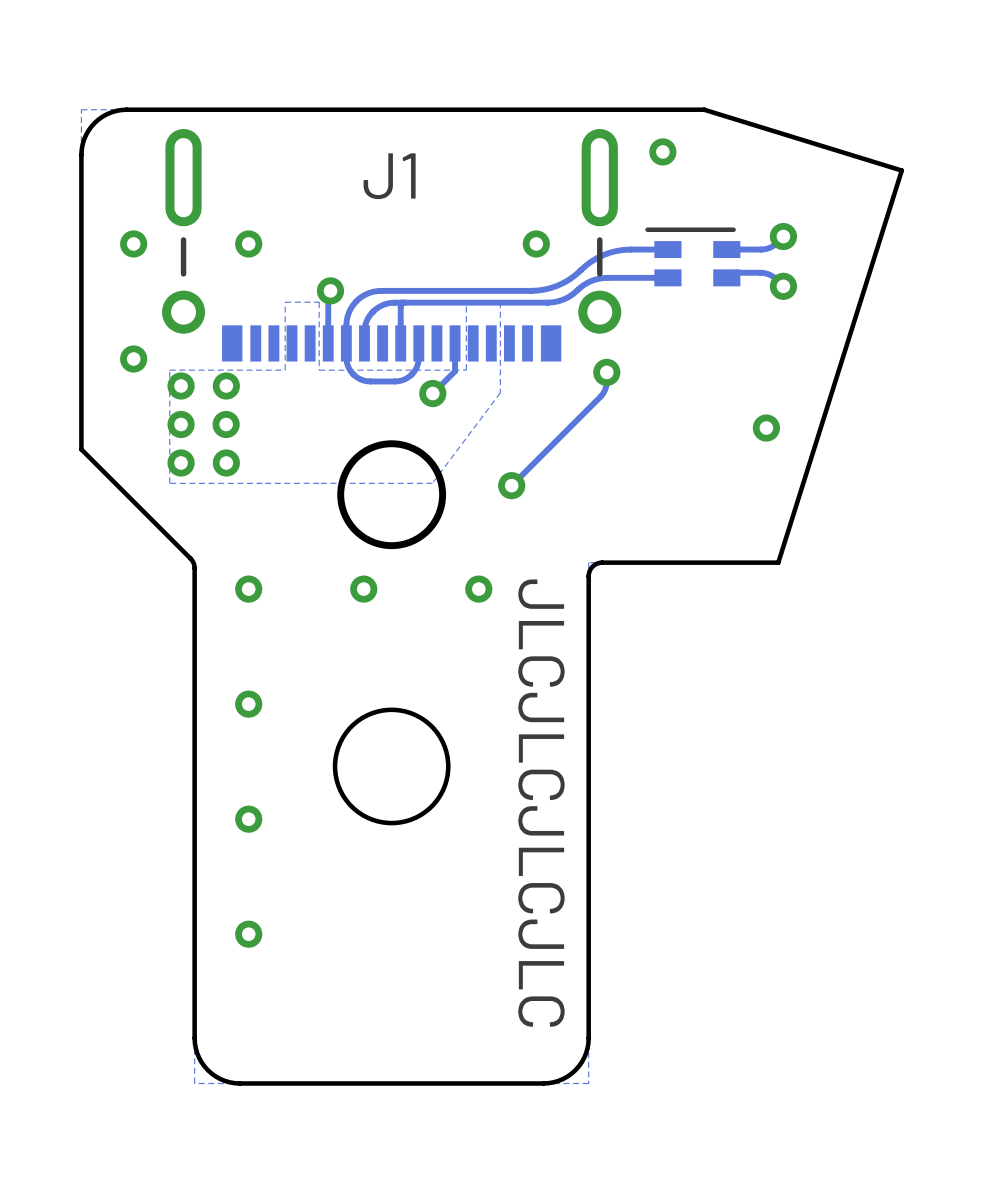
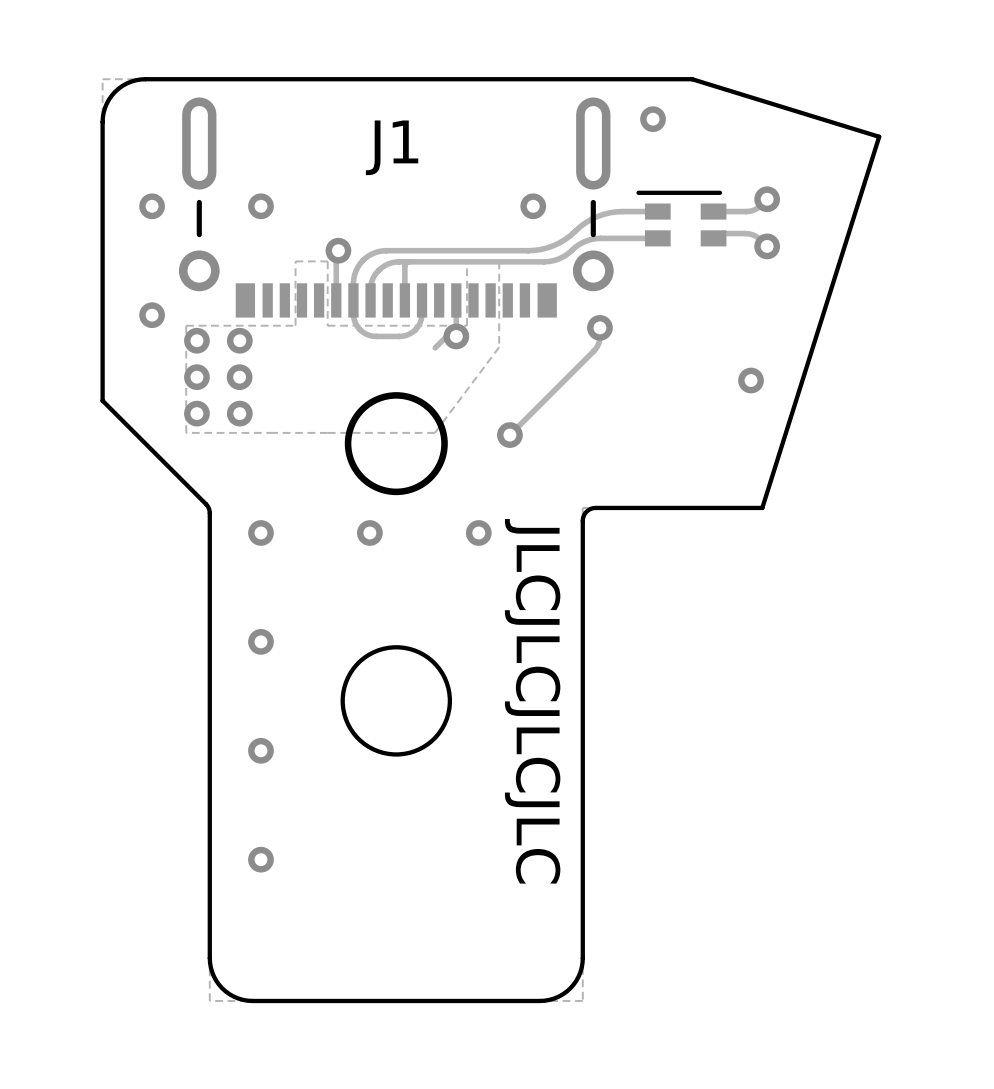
via position: (432, 393) -> (456, 336)

